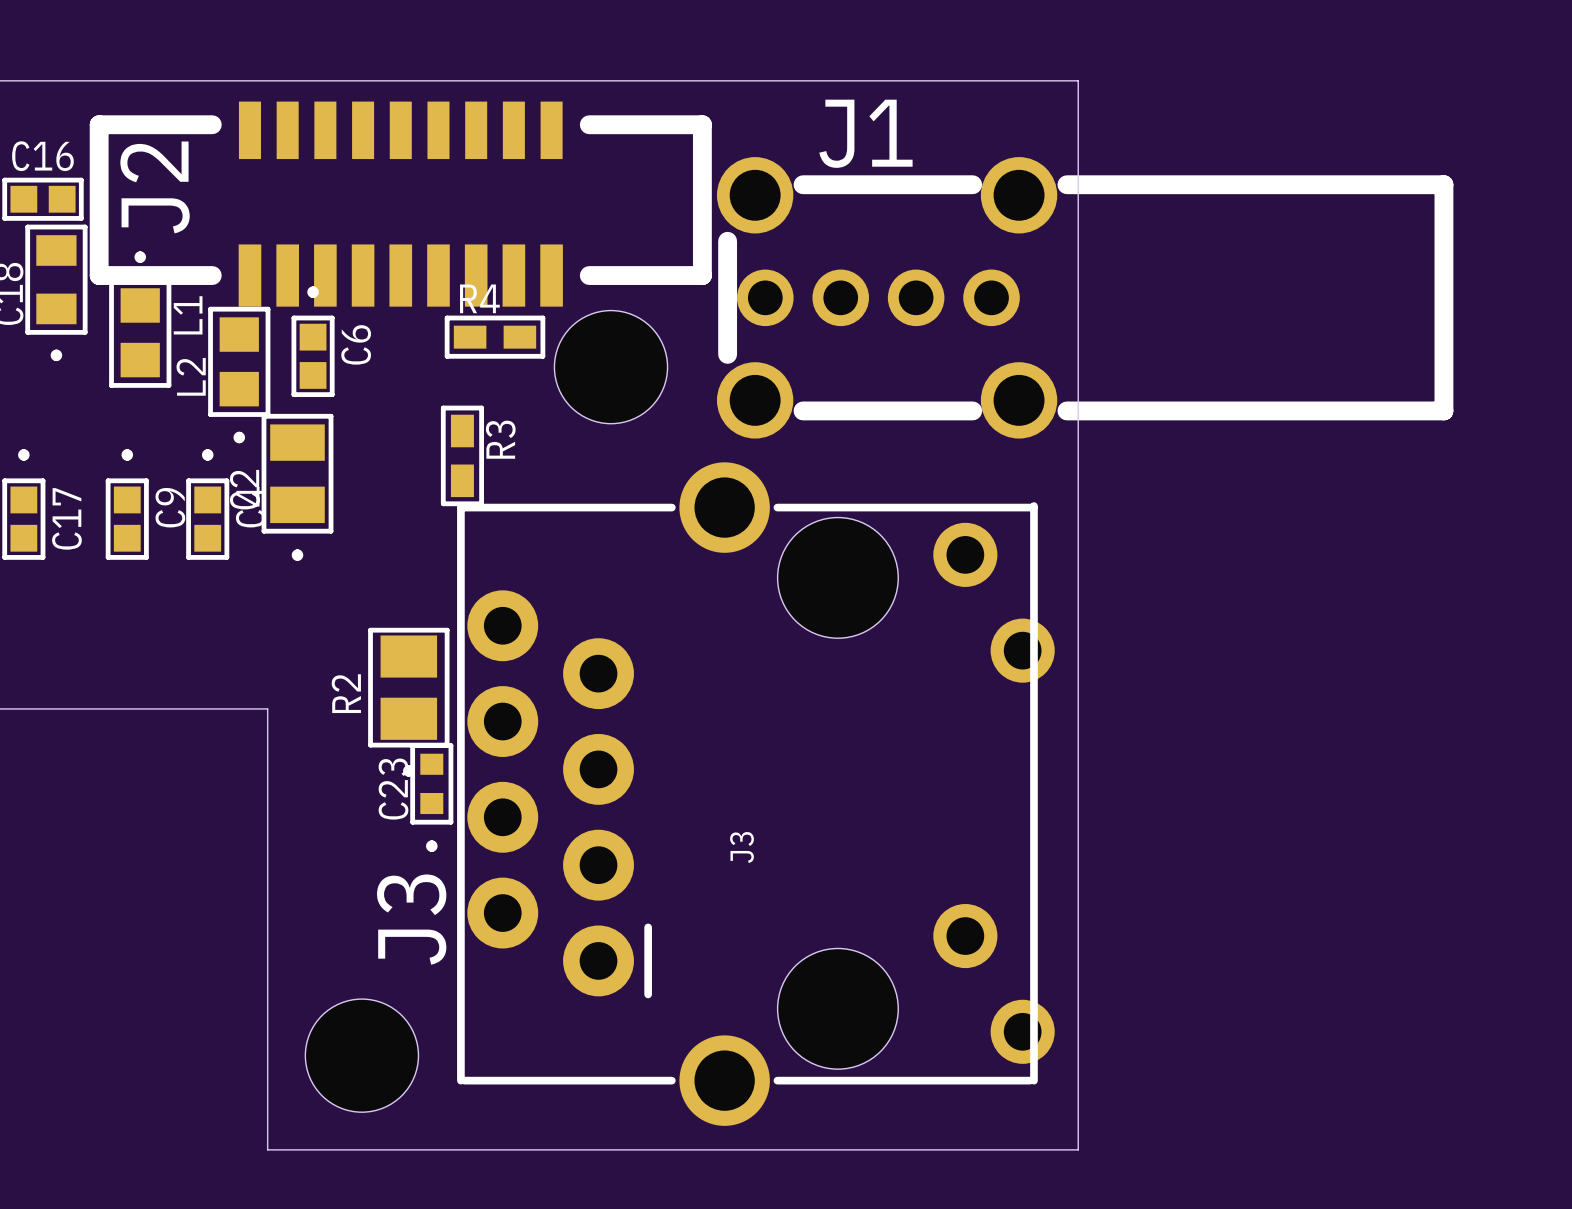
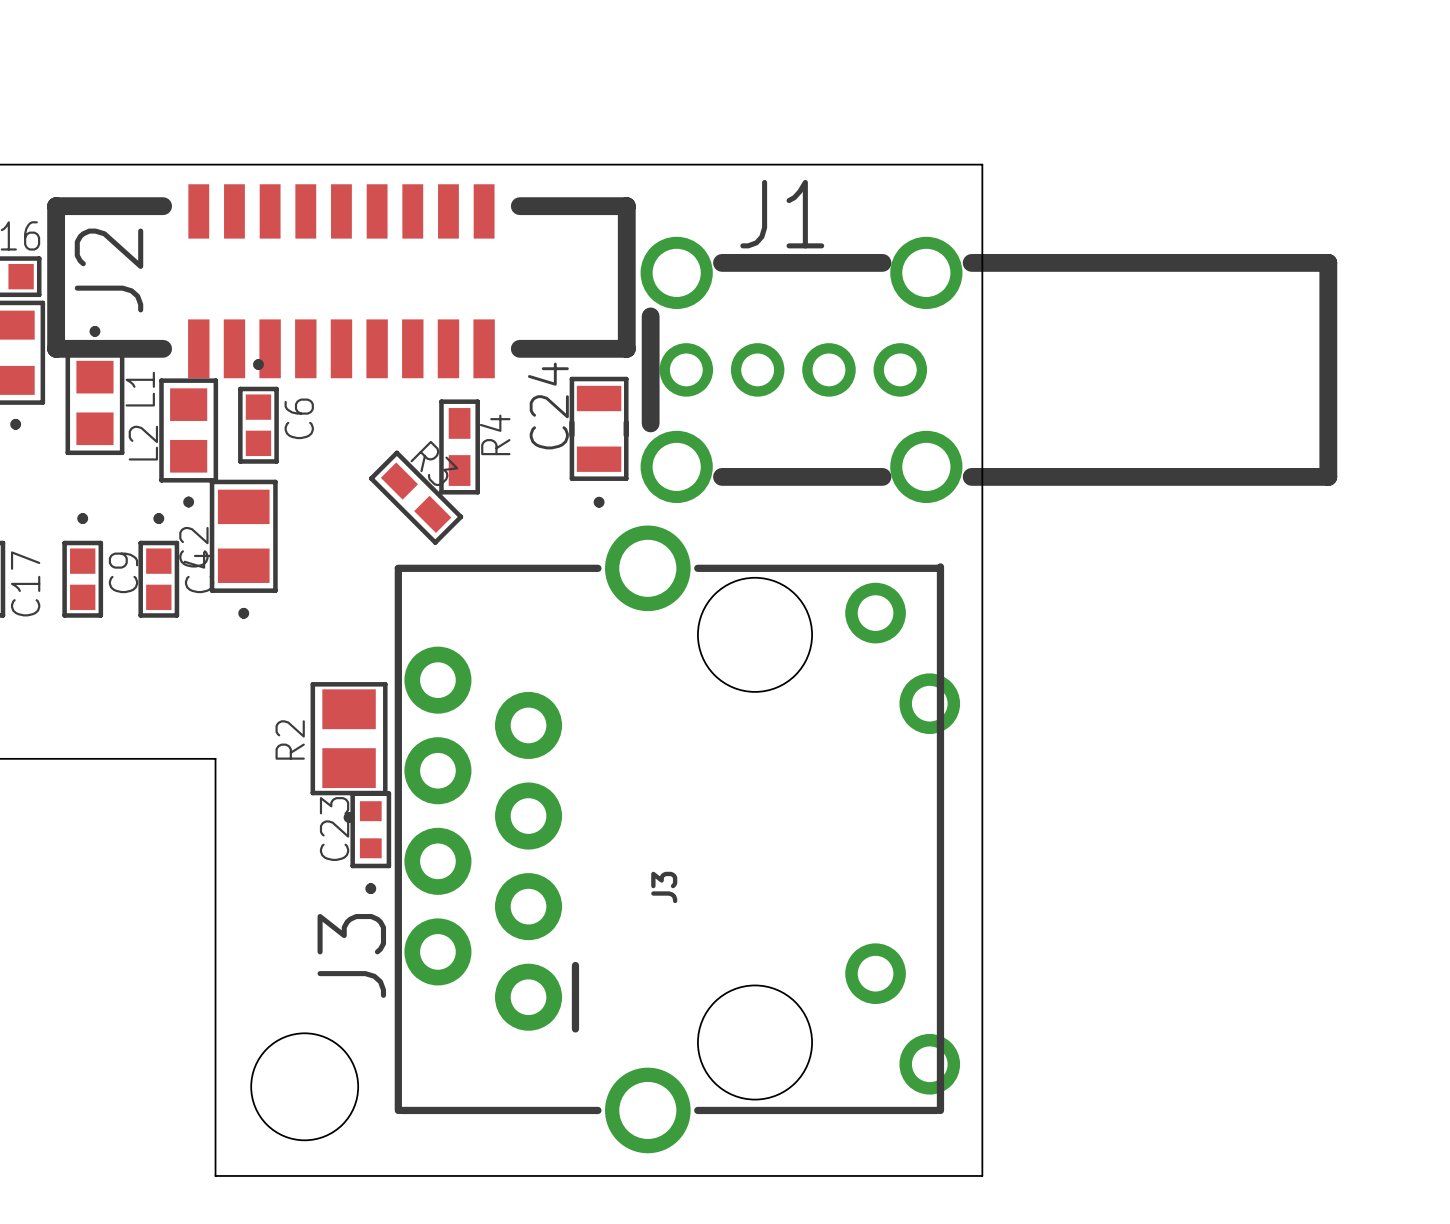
R4 rotation: 0° (495, 337) -> 90° clockwise (459, 446)
hole: (610, 367) -> none
C24: none -> (599, 442)
R3 rotation: 0° (462, 455) -> 45° counterclockwise (416, 497)

